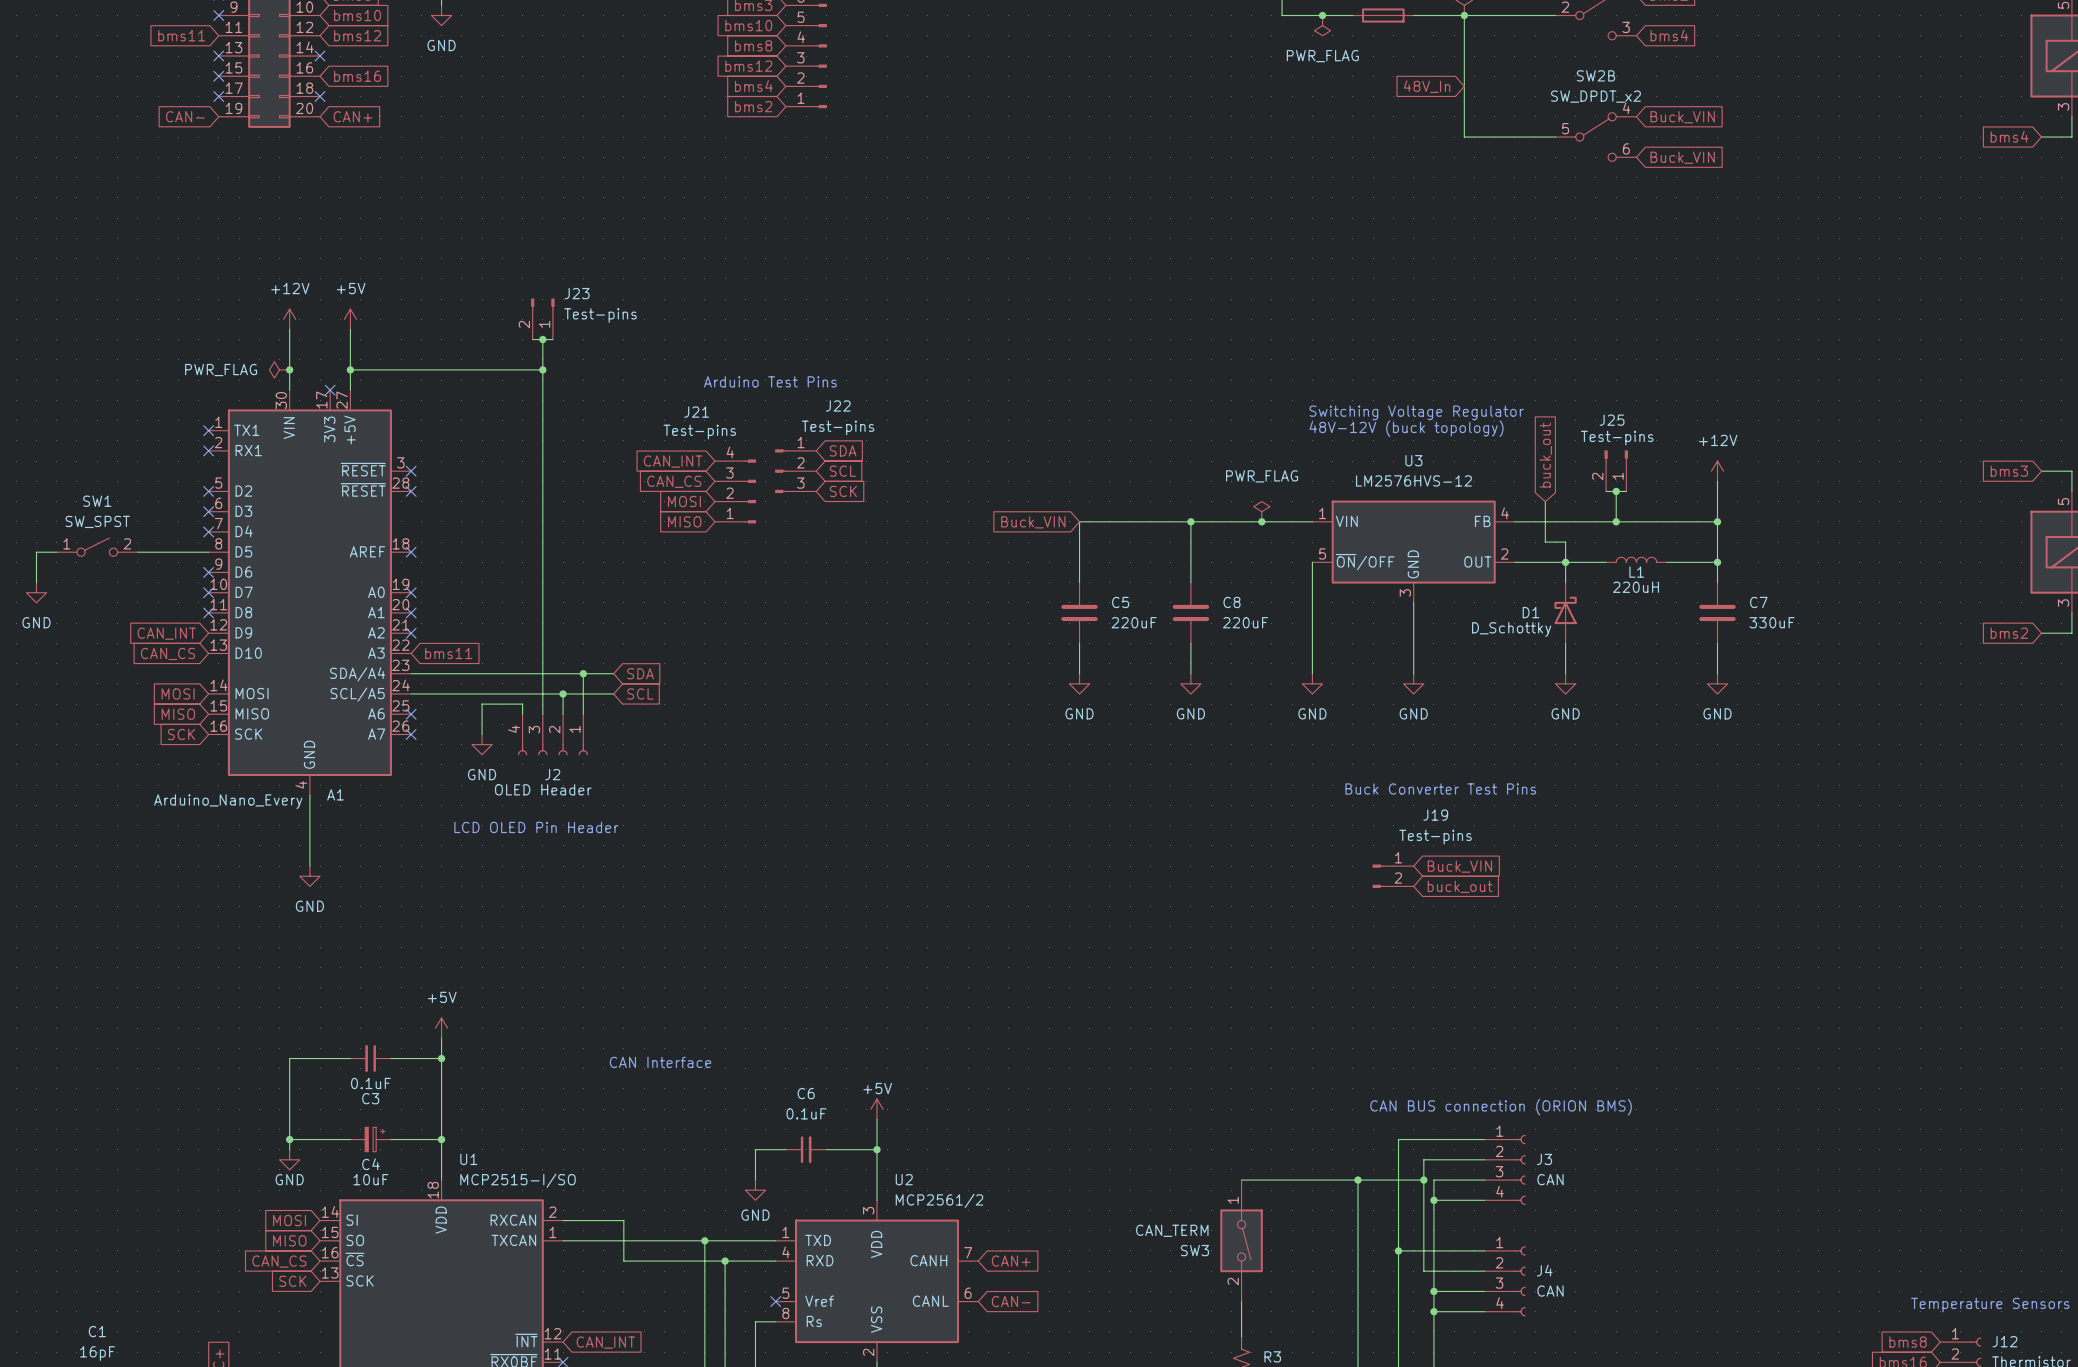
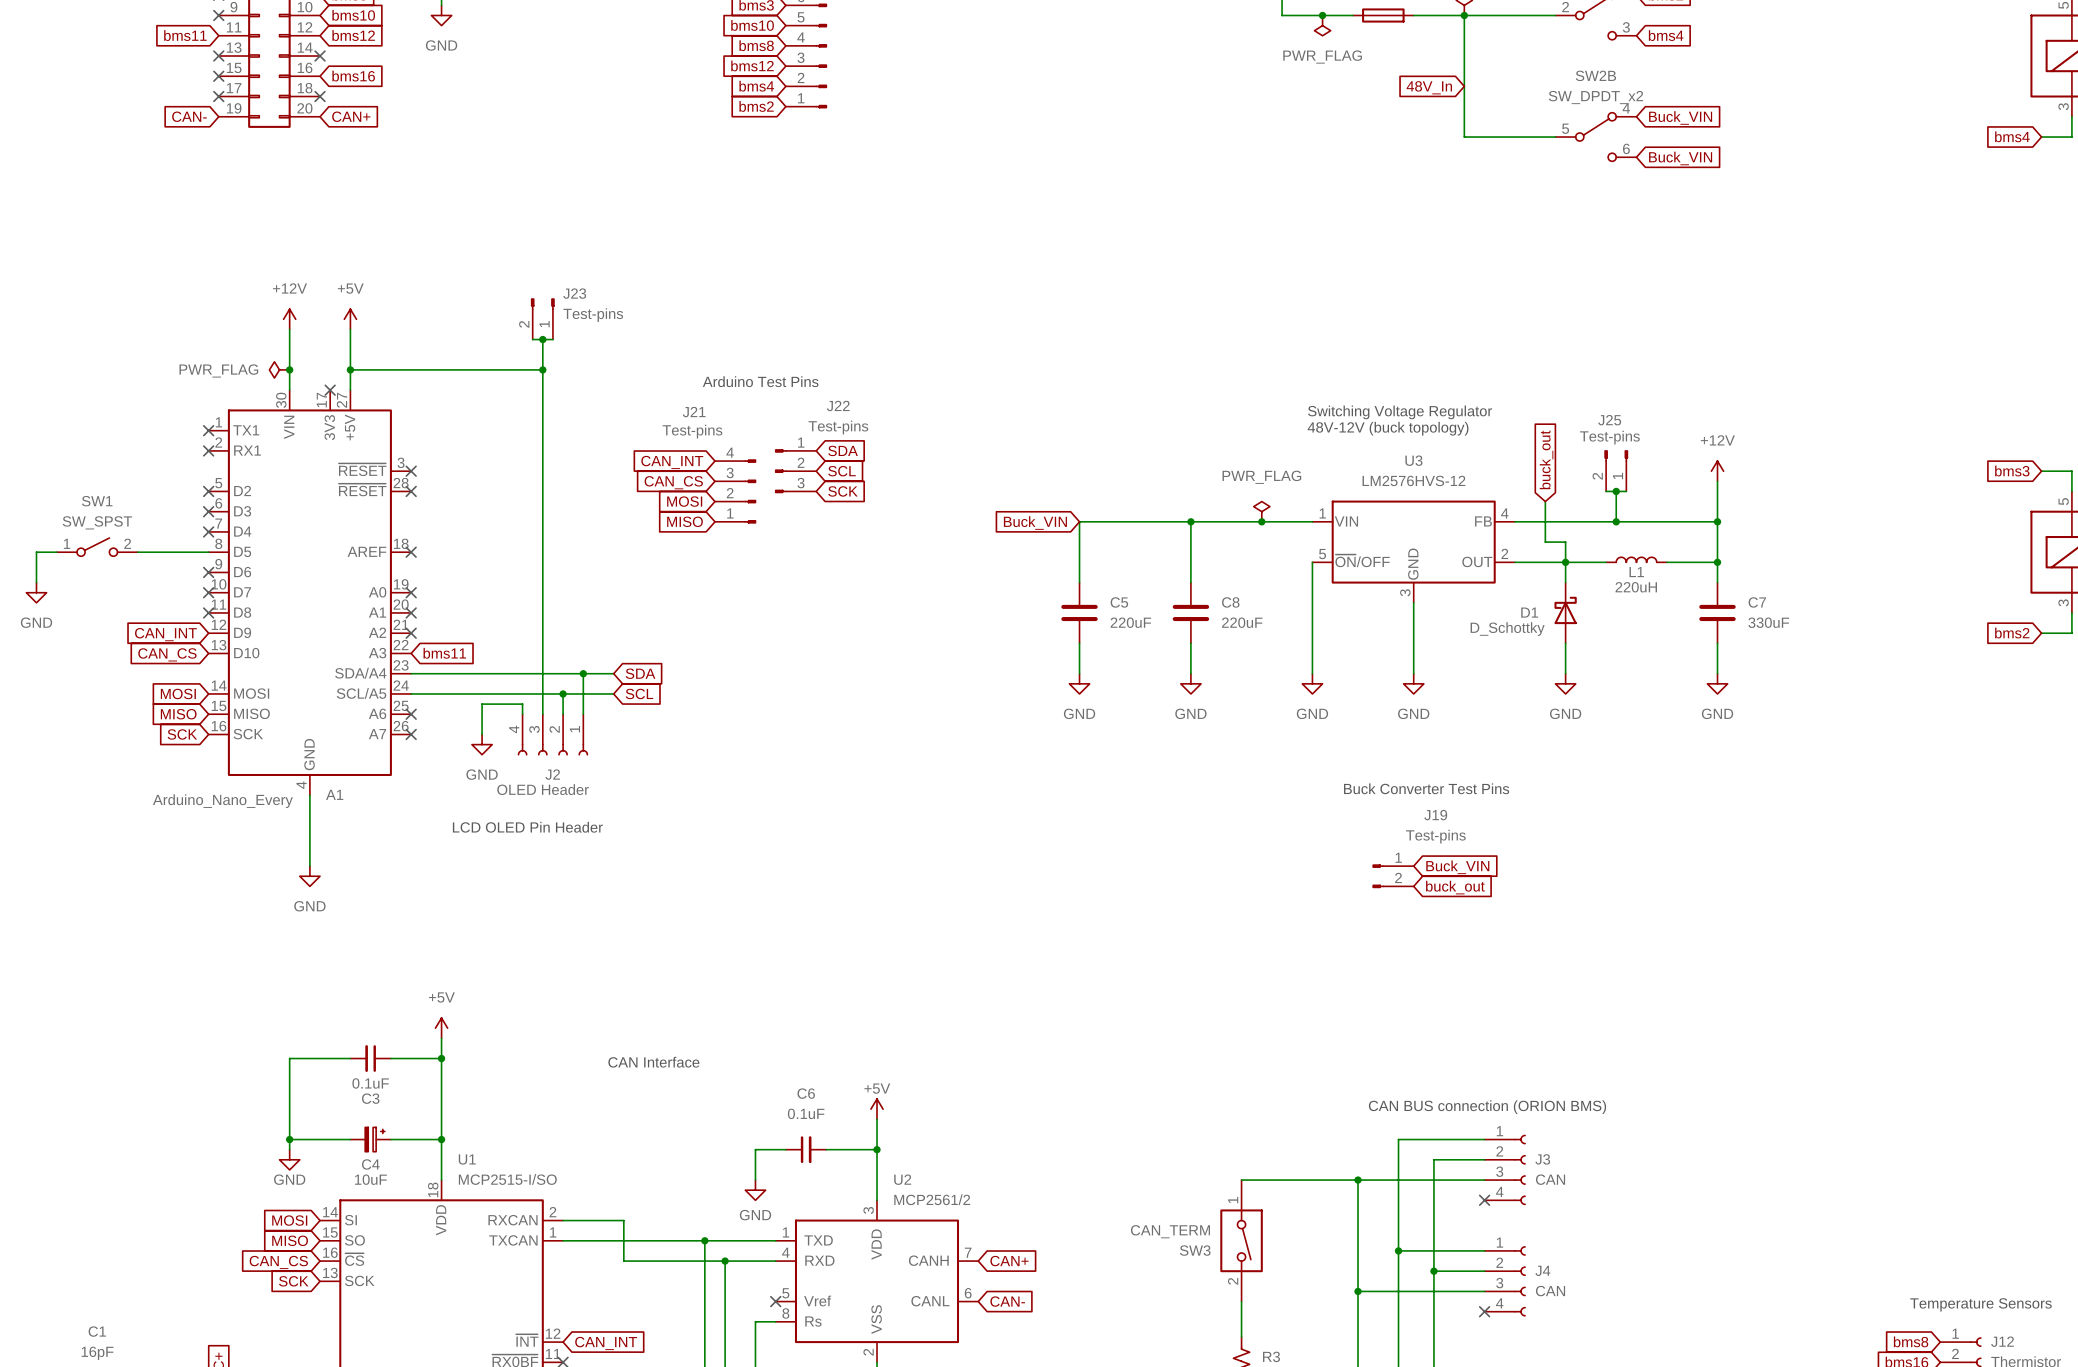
wire: (1433, 1159) (1423, 1159) (1423, 1271) (1433, 1271) -> (1433, 1159) (1433, 1180) (1423, 1180)
junction: (1423, 1180) -> none
wire: (1433, 1200) (1484, 1200) -> none
junction: (1433, 1200) -> none
no-connect mark: none -> (1484, 1200)
junction: none -> (1433, 1271)
wire: none -> (1358, 1291) (1433, 1291)
junction: none -> (1358, 1291)
junction: (1433, 1291) -> none
wire: (1433, 1311) (1484, 1311) -> none
junction: (1433, 1311) -> none
no-connect mark: none -> (1484, 1311)

